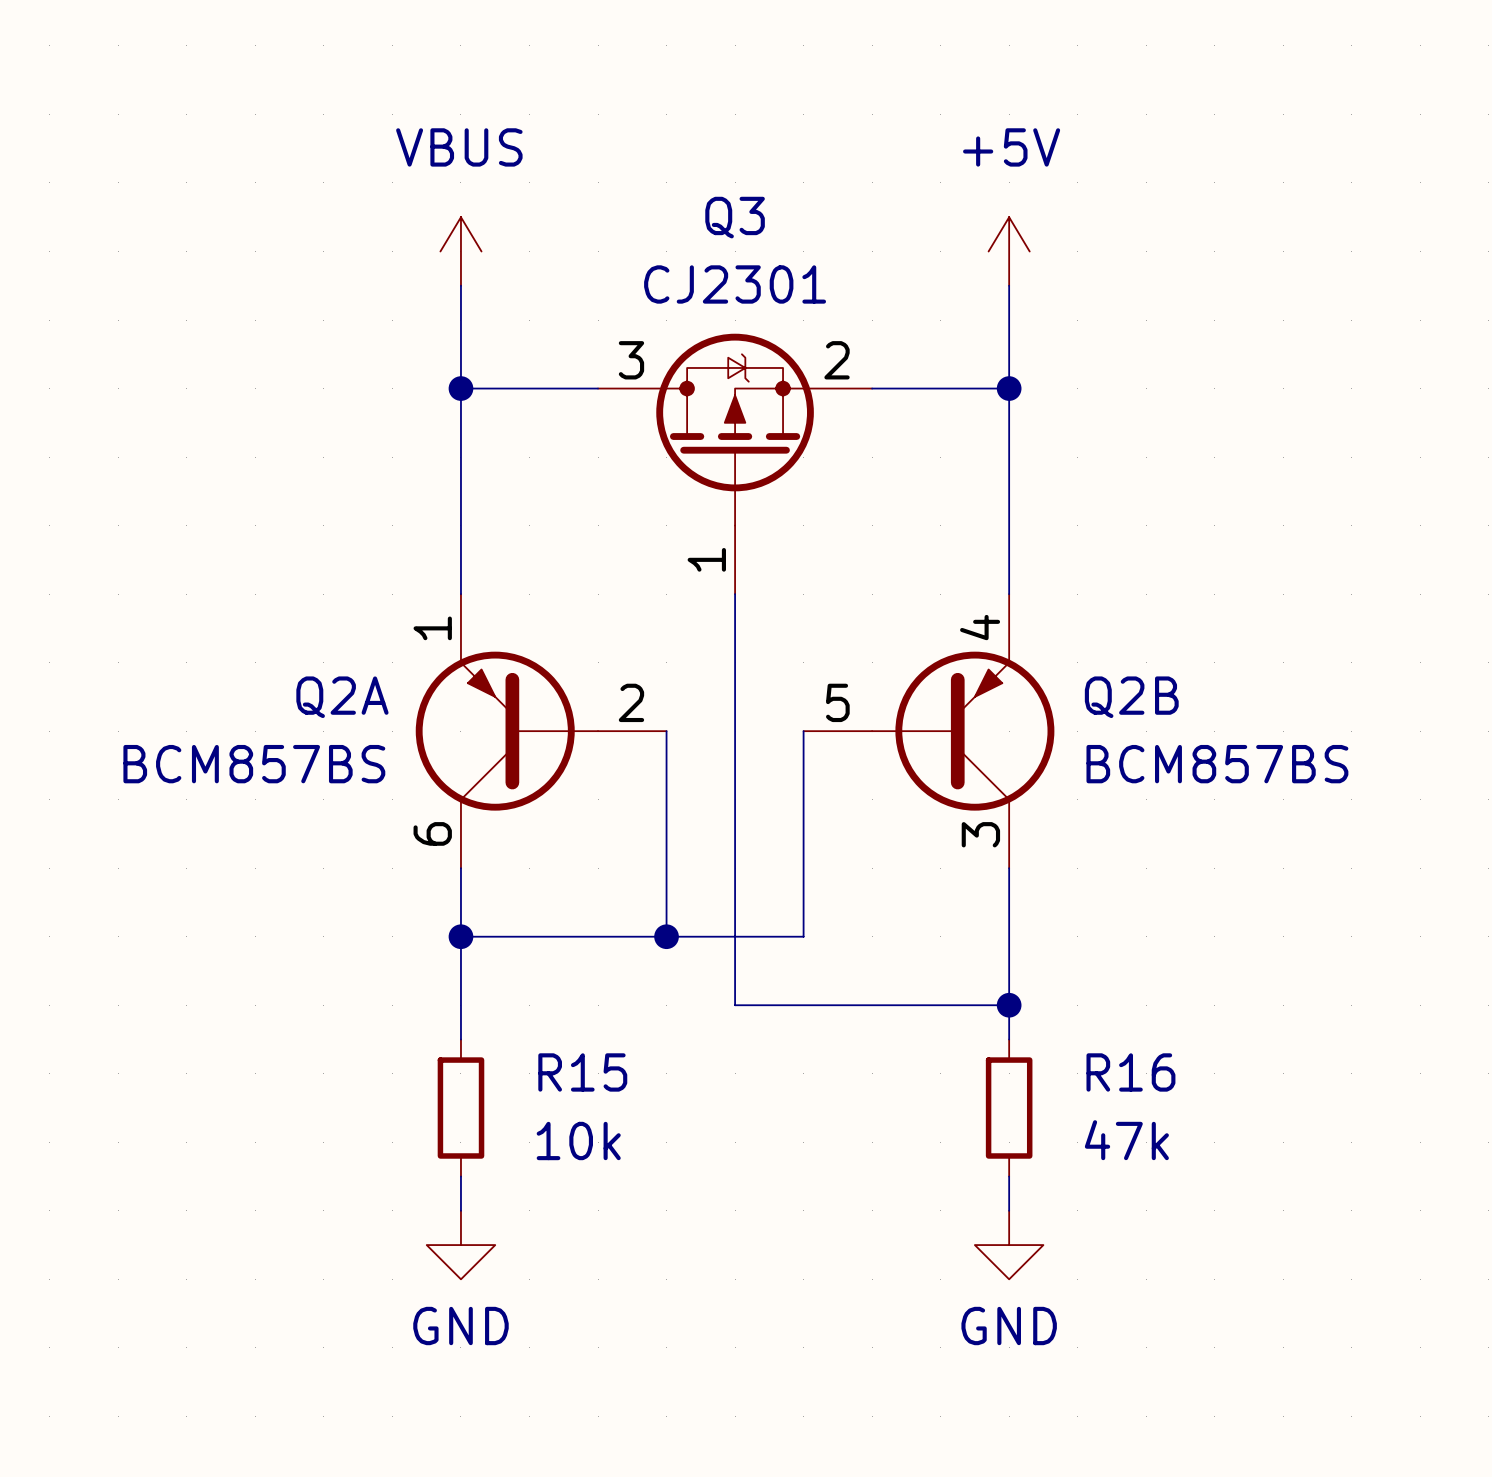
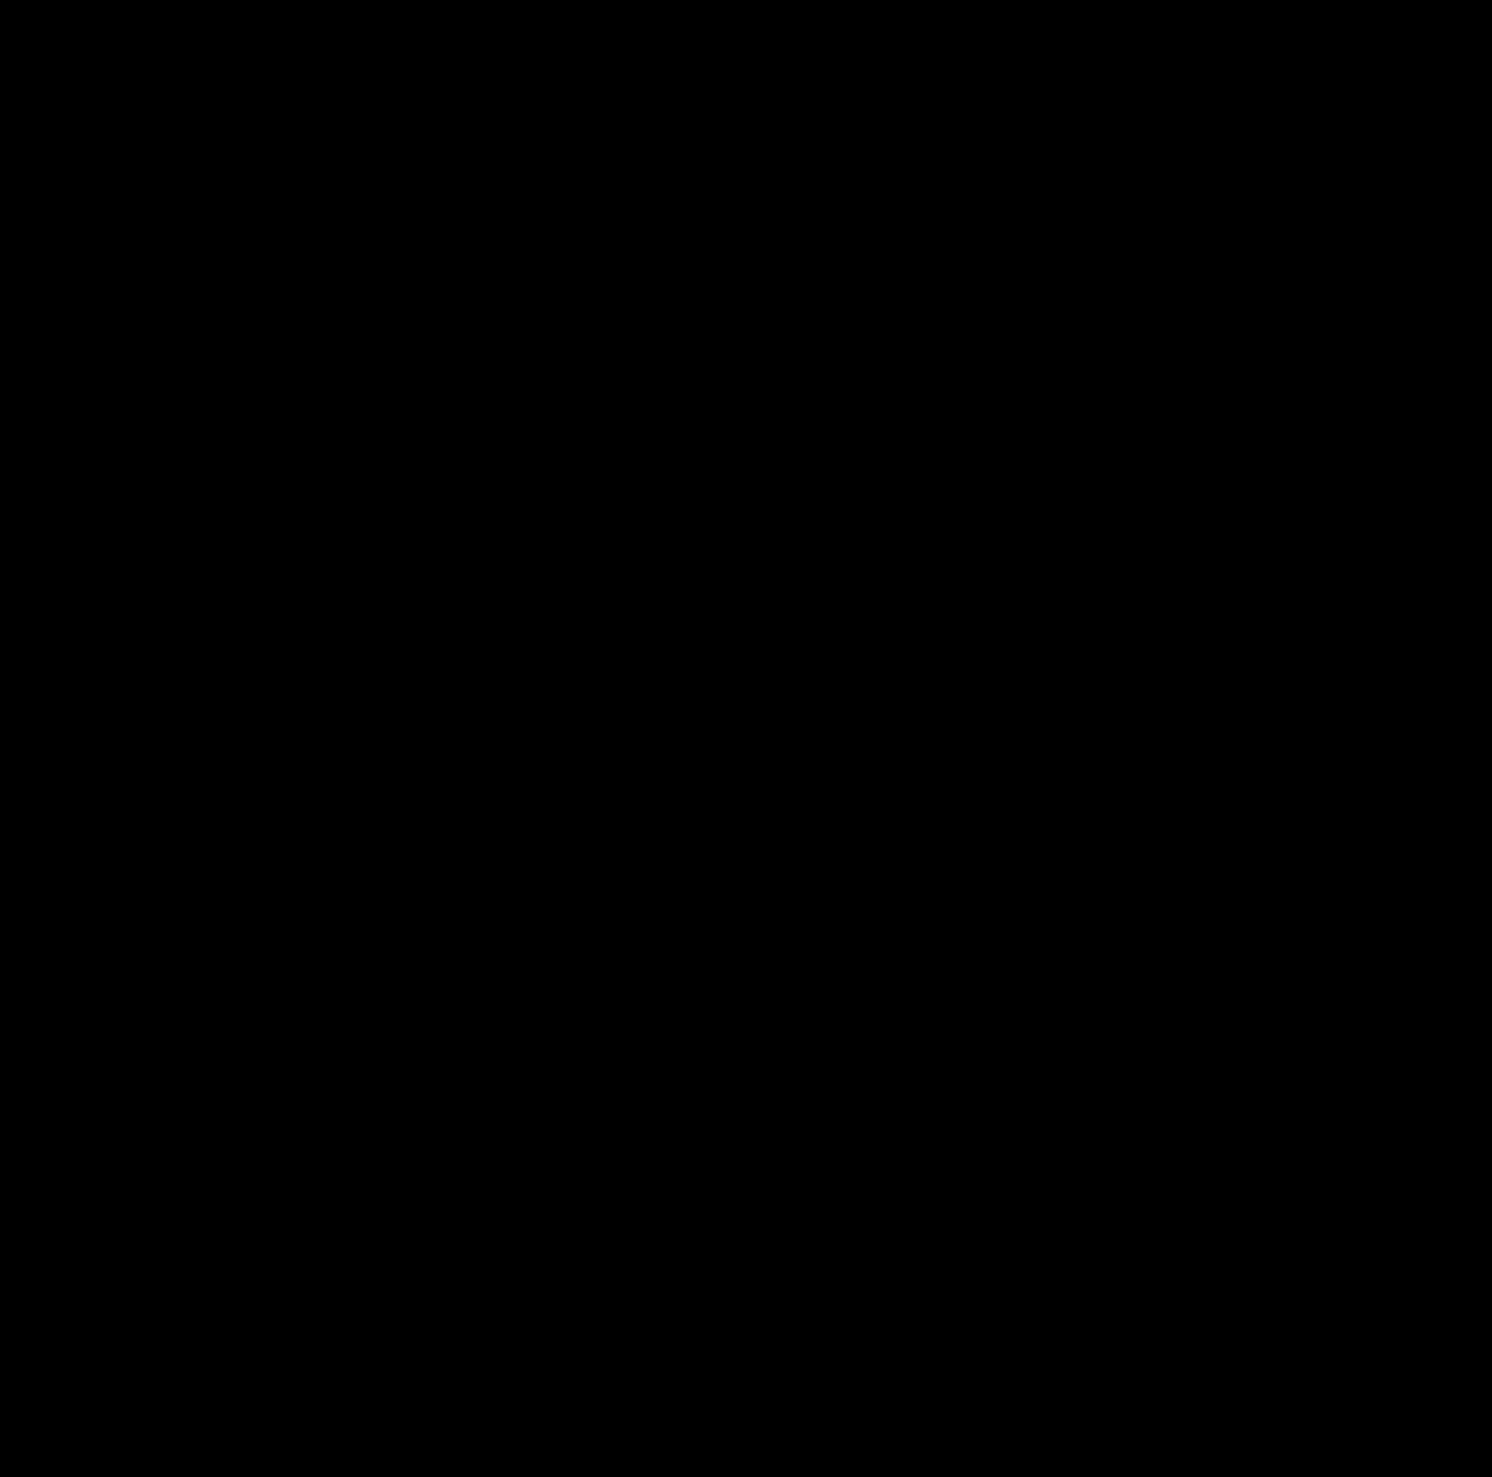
power symbol: VBUS (460, 251) -> none
power symbol: +5V (1009, 251) -> none
wire: (460, 285) (460, 594) -> none
wire: (1009, 285) (1009, 594) -> none
wire: (460, 388) (598, 388) -> none
junction: (460, 388) -> none
wire: (872, 388) (1009, 388) -> none
junction: (1009, 388) -> none
Q3: CJ2301 (735, 463) -> none
wire: (735, 594) (735, 1005) (1009, 1005) -> none
Q2A: BCM857BS (541, 731) -> none
wire: (666, 731) (666, 936) -> none
wire: (803, 731) (803, 936) (460, 936) -> none
Q2B: BCM857BS (928, 731) -> none
wire: (460, 868) (460, 1039) -> none
wire: (1009, 868) (1009, 1039) -> none
junction: (460, 936) -> none
junction: (666, 936) -> none
junction: (1009, 1005) -> none
R15: 10k (460, 1108) -> none
R16: 47k (1009, 1108) -> none
wire: (460, 1176) (460, 1210) -> none
wire: (1009, 1176) (1009, 1210) -> none
power symbol: GND (460, 1245) -> none
power symbol: GND (1009, 1245) -> none

